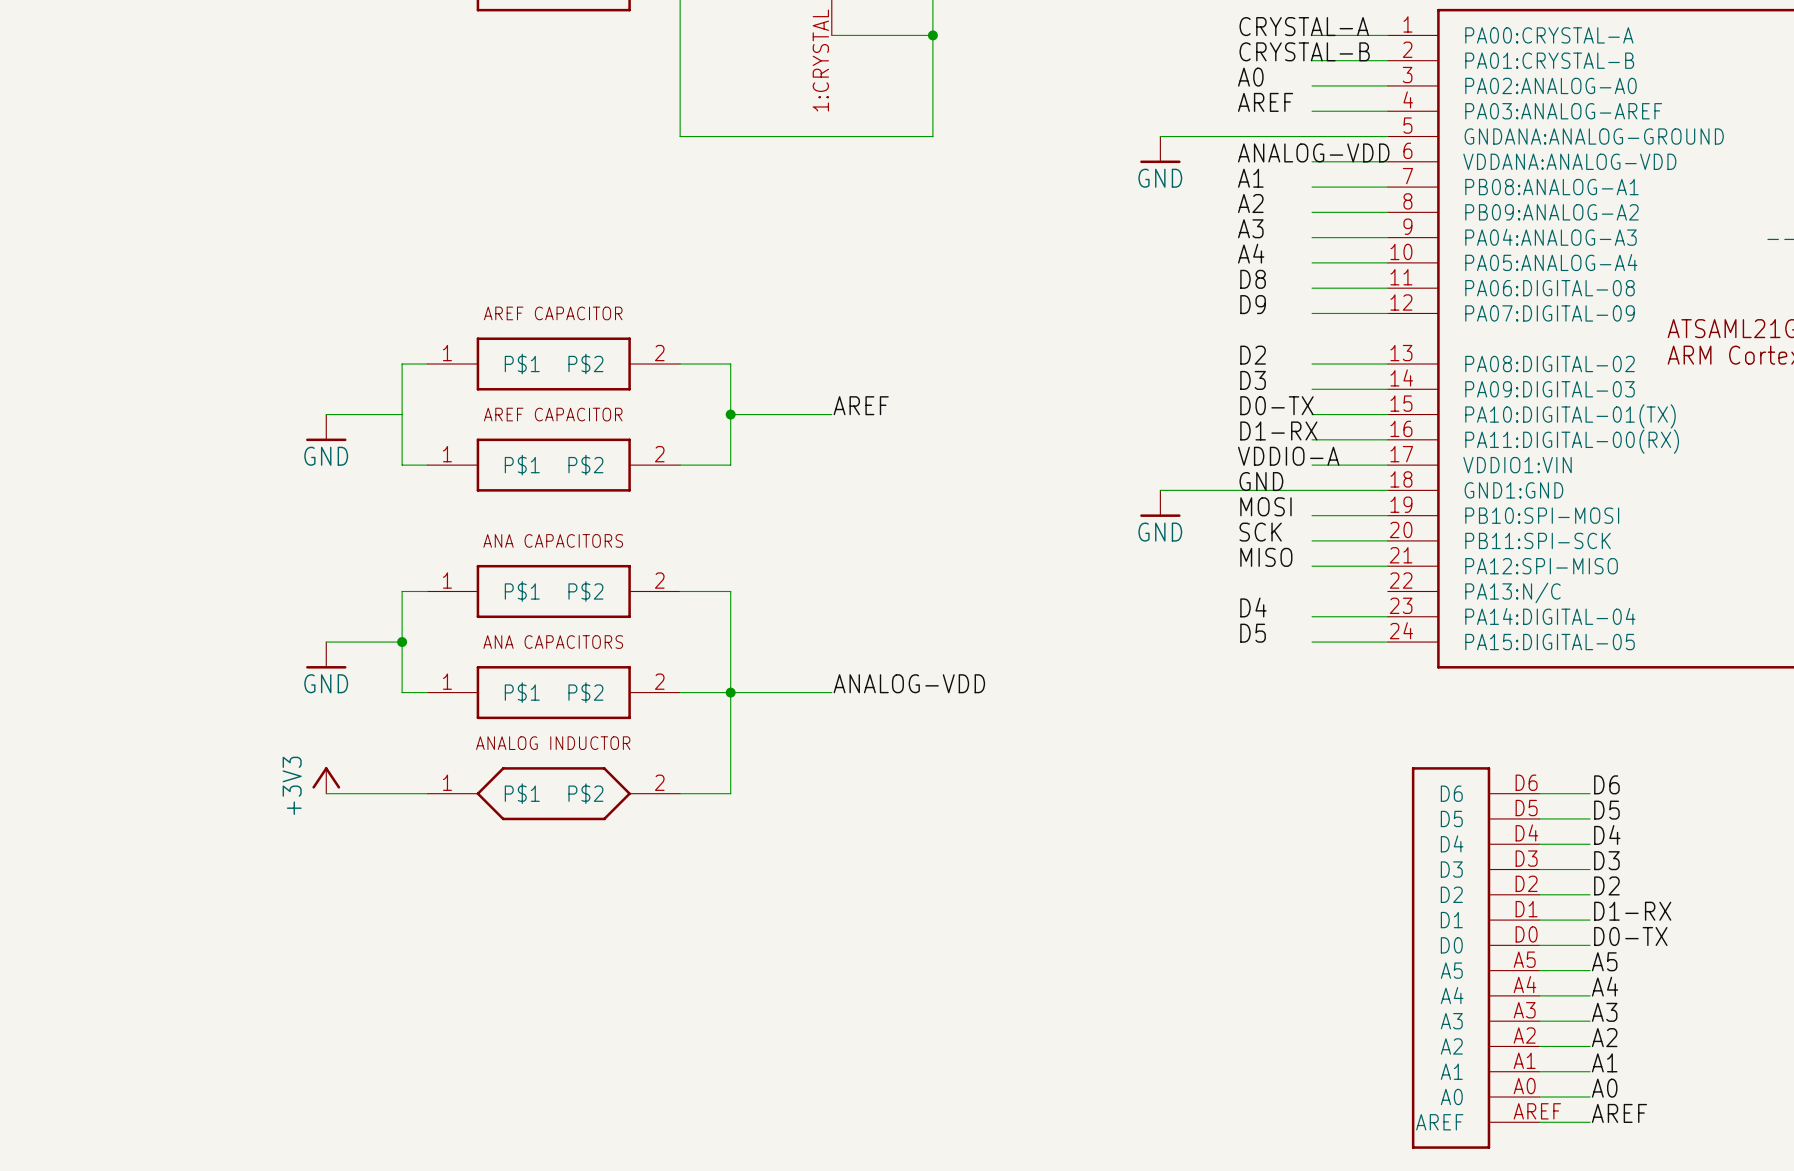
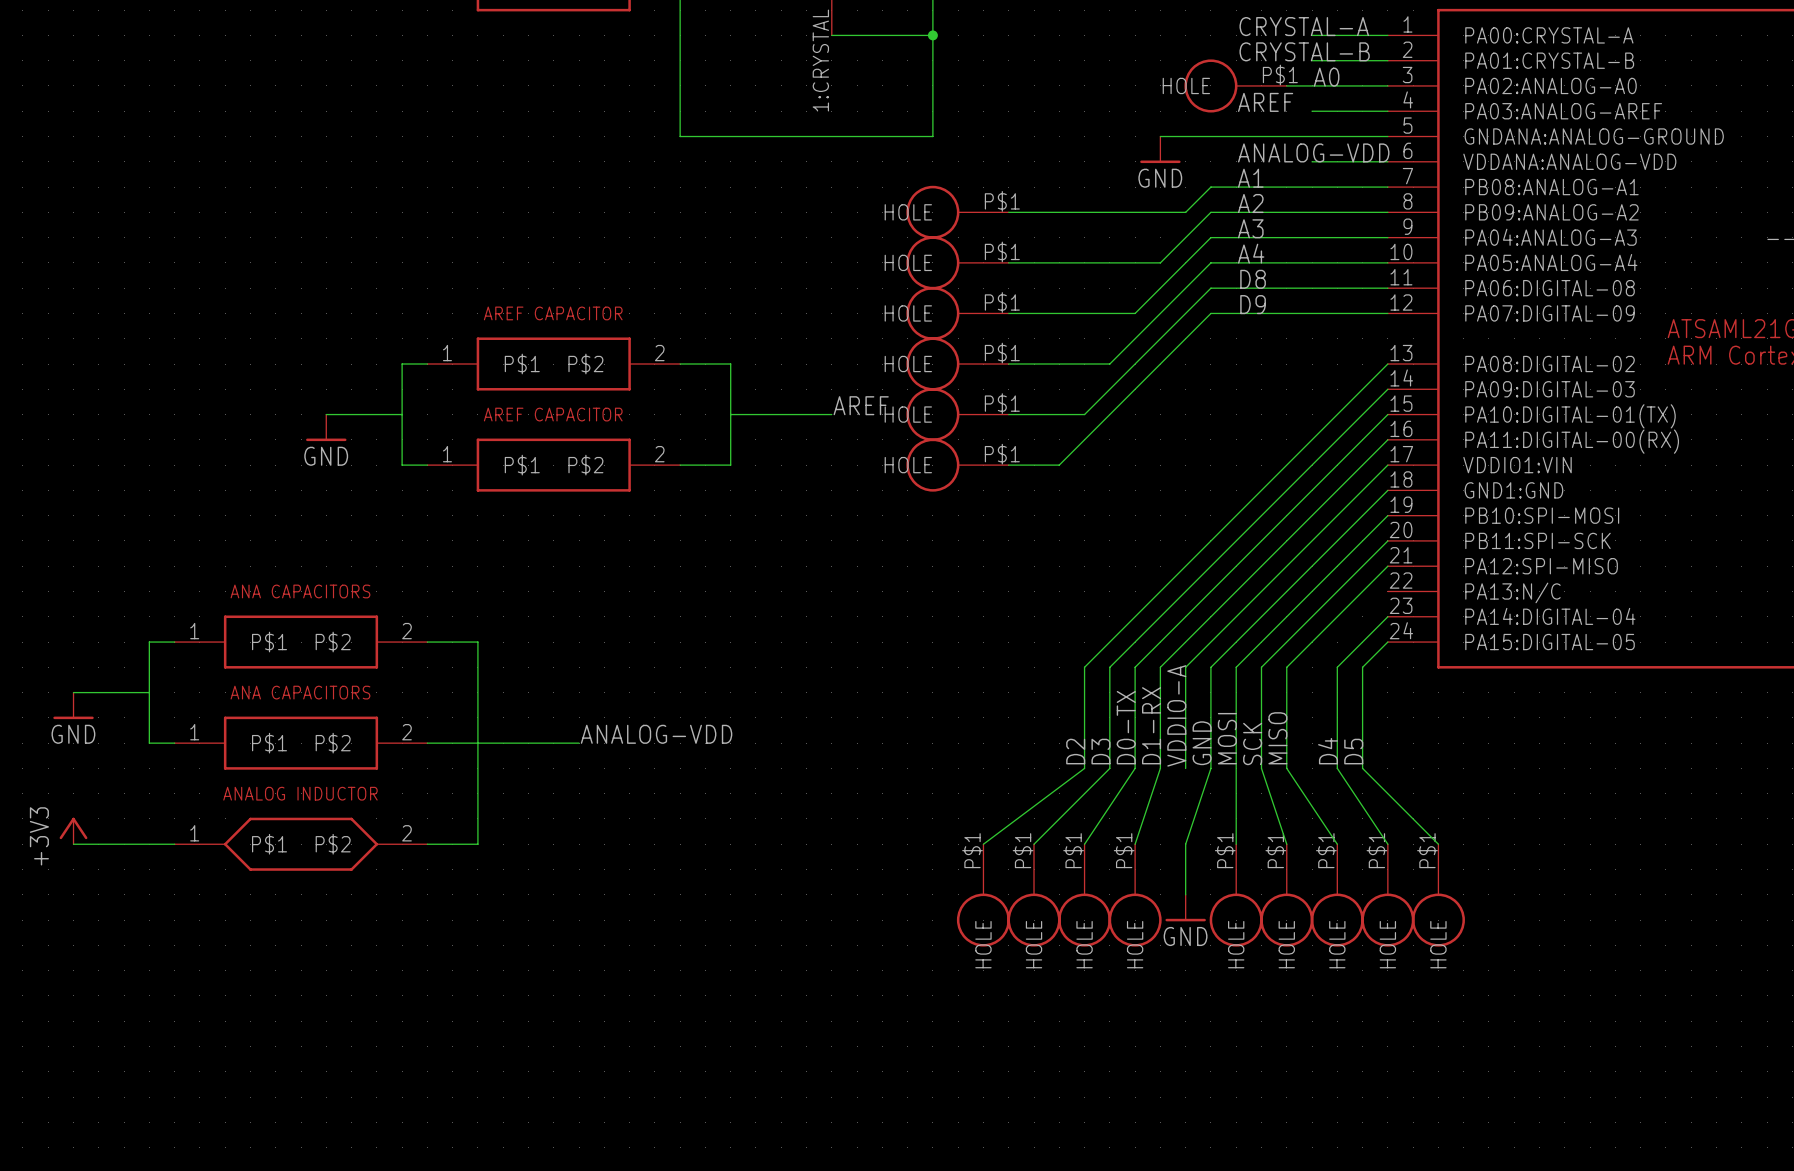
label position: A0 (1250, 77) -> A0 (1326, 77)
part: none -> (1235, 85)
wire: none -> (1286, 85) (1312, 85)
wire: none -> (1312, 187) (1210, 187) (1185, 212) (1008, 212)
part: none -> (957, 212)
wire: none -> (1312, 212) (1210, 212) (1160, 262) (1008, 262)
wire: none -> (1312, 237) (1210, 237) (1135, 313) (1008, 313)
part: none -> (957, 262)
wire: none -> (1312, 262) (1210, 262) (1109, 364) (1008, 364)
wire: none -> (1312, 288) (1210, 288) (1084, 414) (1008, 414)
part: none -> (957, 313)
wire: none -> (1312, 313) (1210, 313) (1059, 465) (1008, 465)
label: D2 (1253, 355) -> none
part: none -> (957, 364)
wire: (1312, 364) (1387, 364) -> (983, 844) (1084, 768) (1084, 667) (1387, 364)
label: D3 (1253, 380) -> none
wire: (1312, 389) (1387, 389) -> (1034, 844) (1109, 768) (1109, 667) (1387, 389)
label: D0-TX (1276, 405) -> none
junction: (730, 414) -> none
part: none -> (957, 414)
wire: (1312, 414) (1387, 414) -> (1084, 844) (1135, 768) (1135, 667) (1387, 414)
label: D1-RX (1278, 430) -> none
wire: (1312, 439) (1387, 439) -> (1135, 844) (1160, 768) (1160, 667) (1387, 439)
label: VDDIO-A (1288, 456) -> none
part: none -> (957, 465)
wire: (1312, 465) (1387, 465) -> (1185, 768) (1185, 667) (1387, 465)
label: GND (1261, 481) -> none
wire: (1160, 490) (1387, 490) -> (1185, 894) (1185, 844) (1210, 768) (1210, 667) (1387, 490)
power symbol: GND (1160, 503) -> none
label: MOSI (1265, 506) -> none
wire: (1312, 515) (1387, 515) -> (1236, 844) (1236, 667) (1387, 515)
label rotation: 0° (1260, 532) -> 90° counterclockwise (1252, 743)
label position: SCK (1260, 532) -> SCK (1252, 743)
wire: (1312, 540) (1387, 540) -> (1286, 844) (1261, 768) (1261, 667) (1387, 540)
label rotation: 0° (1266, 557) -> 90° counterclockwise (1277, 738)
label position: MISO (1266, 557) -> MISO (1277, 738)
wire: (1312, 566) (1387, 566) -> (1337, 844) (1286, 768) (1286, 667) (1387, 566)
wire: (427, 591) (402, 591) (402, 692) (427, 692) -> none
part: (553, 591) -> none
wire: (680, 591) (730, 591) (730, 793) (680, 793) -> none
label: D4 (1253, 607) -> none
wire: (1312, 616) (1387, 616) -> (1387, 844) (1337, 768) (1337, 667) (1387, 616)
label: D5 (1253, 633) -> none
wire: none -> (174, 642) (149, 642) (149, 743) (174, 743)
part: none -> (301, 642)
wire: (326, 642) (402, 642) -> none
junction: (402, 642) -> none
wire: none -> (427, 642) (477, 642) (477, 844) (427, 844)
wire: (1312, 642) (1387, 642) -> (1438, 844) (1362, 768) (1362, 667) (1387, 642)
power symbol: GND (326, 655) -> none
label: ANALOG-VDD (909, 683) -> none
wire: none -> (73, 692) (149, 692)
part: (553, 692) -> none
wire: (680, 692) (831, 692) -> none
junction: (730, 692) -> none
power symbol: none -> GND (73, 705)
label: none -> VDDIO-A (1176, 715)
label: none -> D1-RX (1151, 725)
label: none -> D0-TX (1126, 727)
label: none -> ANALOG-VDD (656, 734)
label: none -> MOSI (1227, 738)
part: none -> (301, 743)
wire: none -> (427, 743) (579, 743)
label: none -> GND (1202, 743)
label: none -> D2 (1075, 751)
label: none -> D3 (1100, 751)
label: none -> D4 (1328, 751)
label: none -> D5 (1353, 751)
power symbol: +3V3 (326, 780) -> none
label: D6 (1606, 784) -> none
wire: (326, 793) (427, 793) -> none
part: (553, 793) -> none
wire: (1539, 793) (1590, 793) -> none
label: D5 (1606, 810) -> none
wire: (1539, 818) (1590, 818) -> none
power symbol: none -> +3V3 (73, 830)
label: D4 (1607, 834) -> none
wire: none -> (73, 844) (174, 844)
part: none -> (301, 844)
wire: (1539, 844) (1590, 844) -> none
label: D3 (1606, 860) -> none
wire: (1539, 869) (1590, 869) -> none
label: D2 (1606, 885) -> none
wire: (1539, 894) (1590, 894) -> none
part: none -> (983, 895)
part: none -> (1034, 895)
part: none -> (1084, 895)
part: none -> (1135, 895)
part: none -> (1236, 895)
part: none -> (1286, 895)
part: none -> (1337, 895)
part: none -> (1387, 895)
part: none -> (1438, 895)
power symbol: none -> GND (1185, 908)
label: D1-RX (1632, 911) -> none
wire: (1539, 920) (1590, 920) -> none
label: D0-TX (1630, 936) -> none
wire: (1539, 945) (1590, 945) -> none
part: (1475, 957) -> none
label: A5 (1604, 961) -> none
wire: (1539, 970) (1590, 970) -> none
label: A4 (1605, 986) -> none
wire: (1539, 995) (1590, 995) -> none
label: A3 (1604, 1012) -> none
wire: (1539, 1021) (1590, 1021) -> none
label: A2 (1604, 1037) -> none
wire: (1539, 1046) (1590, 1046) -> none
label: A1 (1604, 1062) -> none
wire: (1539, 1071) (1590, 1071) -> none
label: A0 (1604, 1088) -> none
wire: (1539, 1097) (1590, 1097) -> none
label: AREF (1619, 1113) -> none
wire: (1539, 1122) (1590, 1122) -> none

